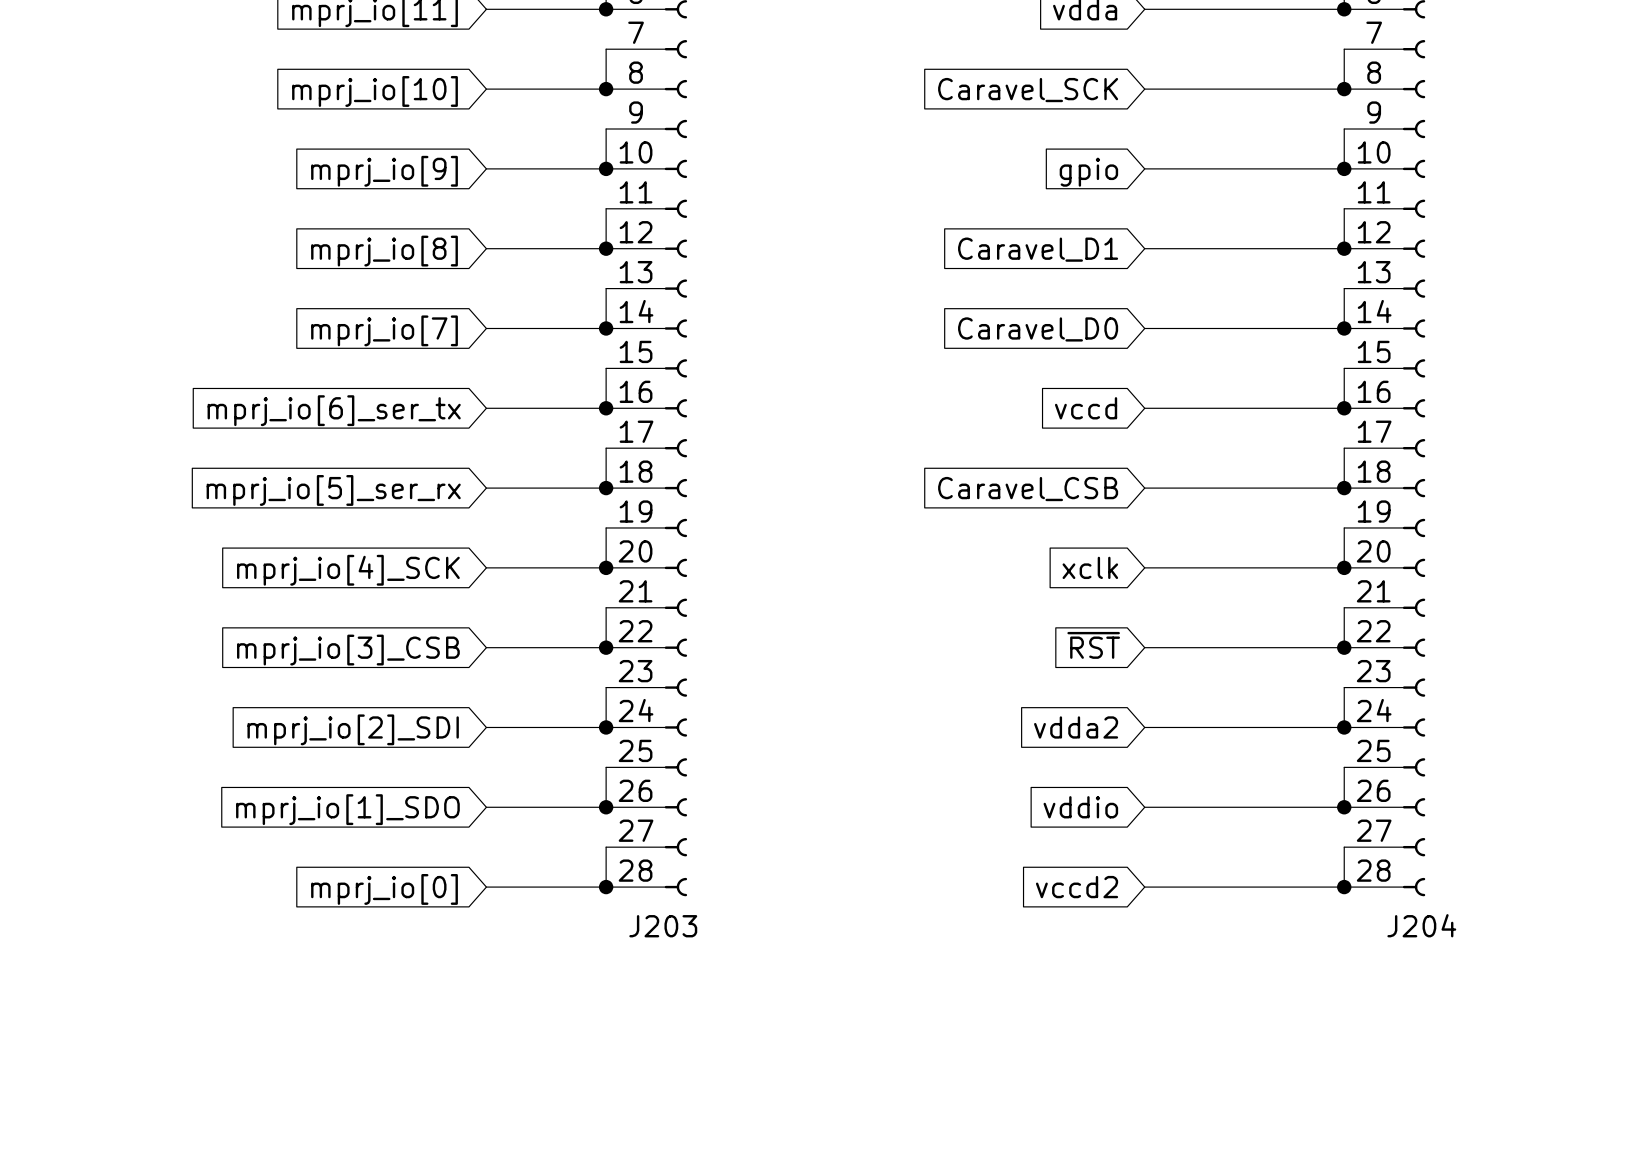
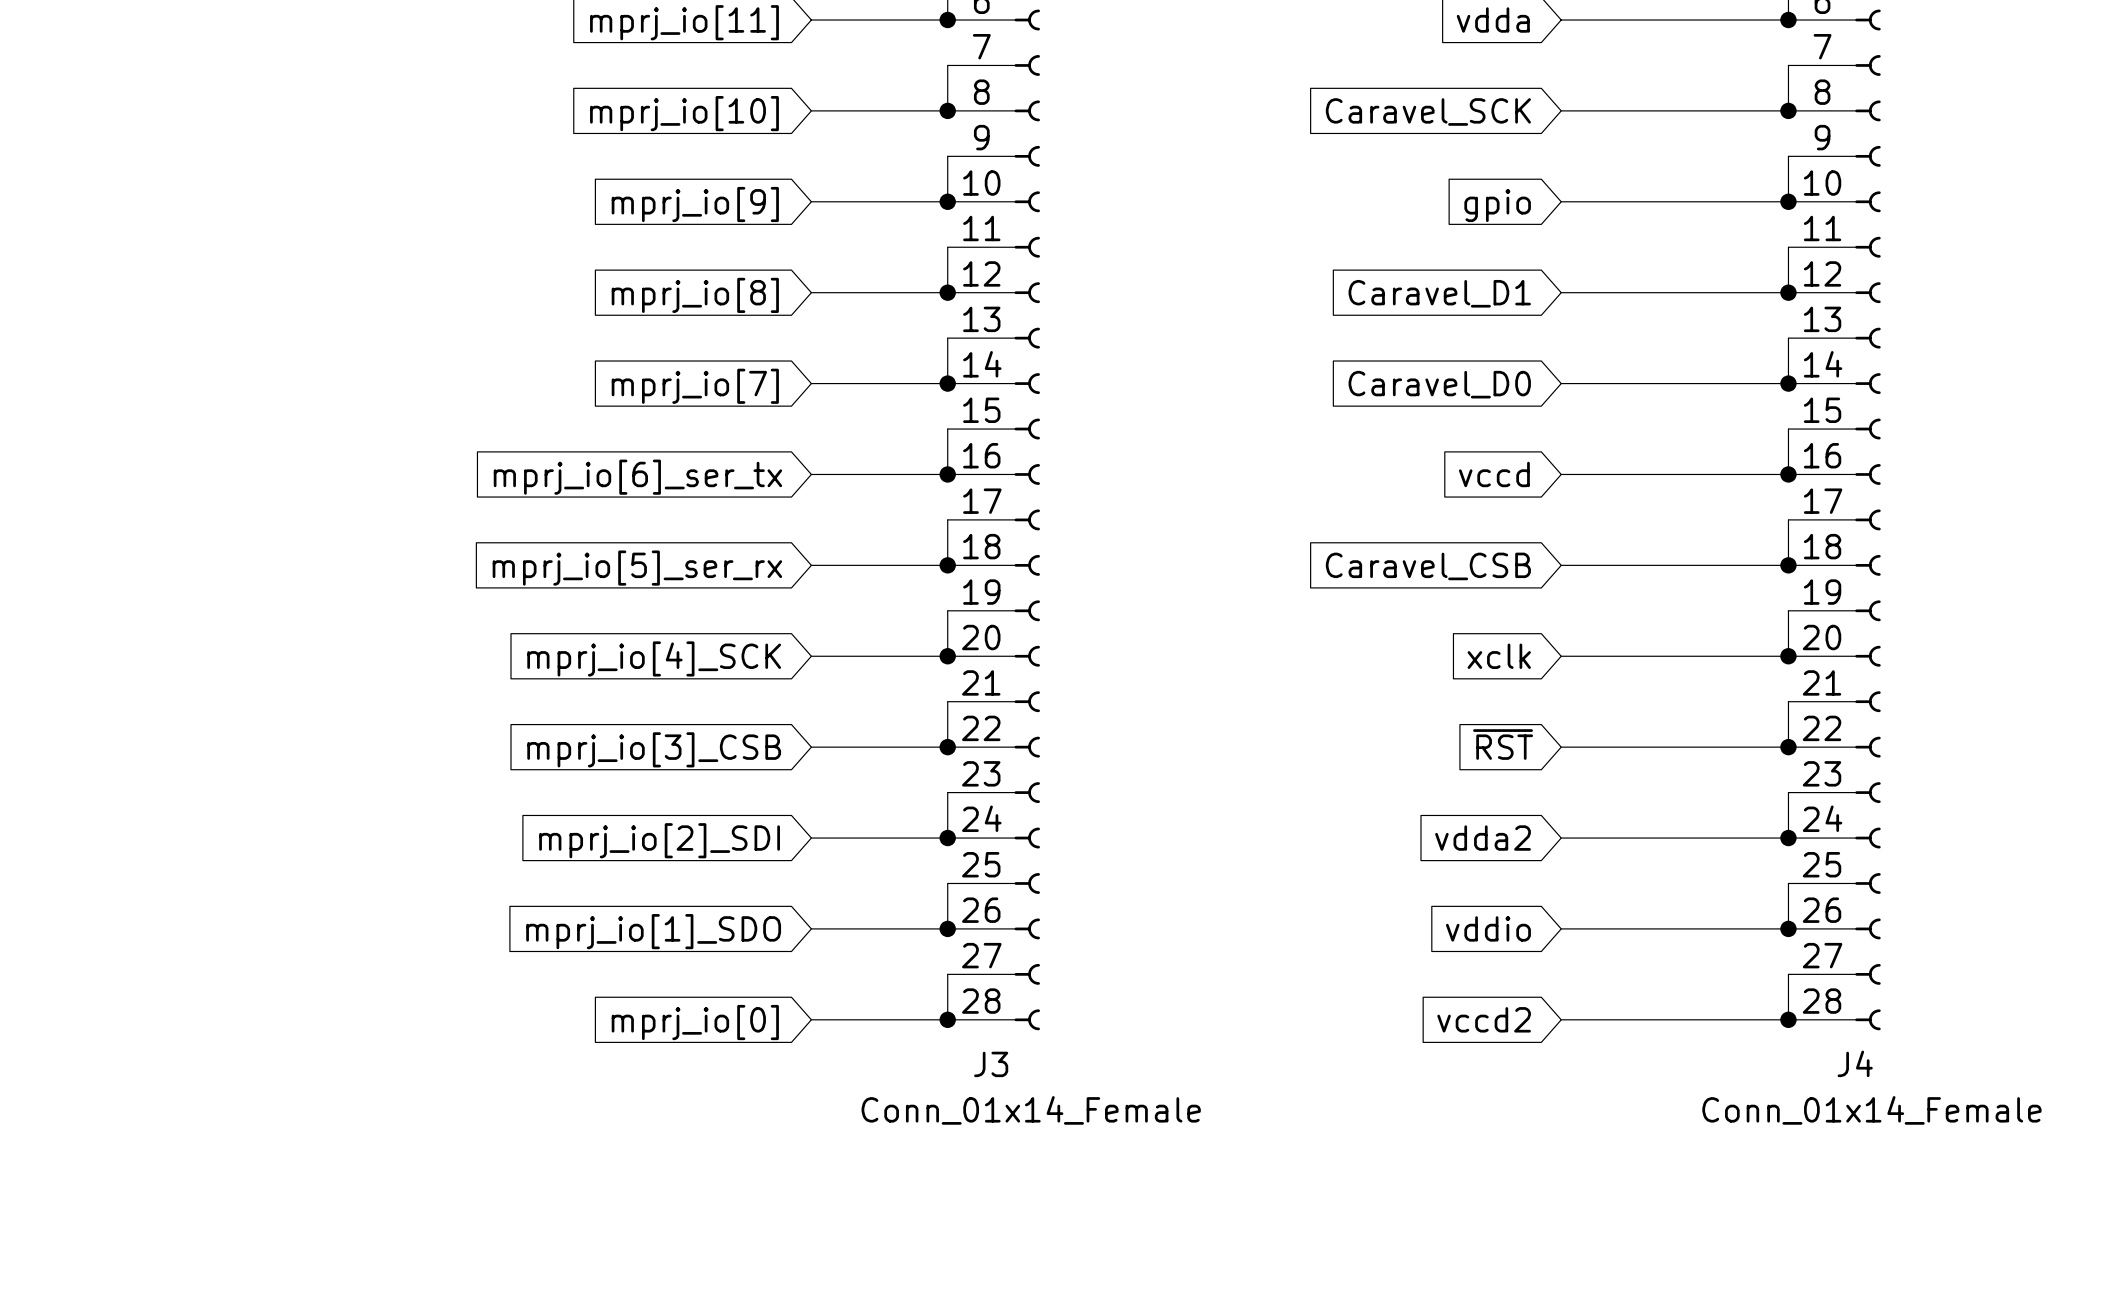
J204 name: J204 (1421, 925) -> J4 (1855, 1063)
J203 name: J203 (663, 926) -> J3 (991, 1064)
J203 value: none -> Conn_01x14_Female (1031, 1110)
J204 value: none -> Conn_01x14_Female (1871, 1110)

